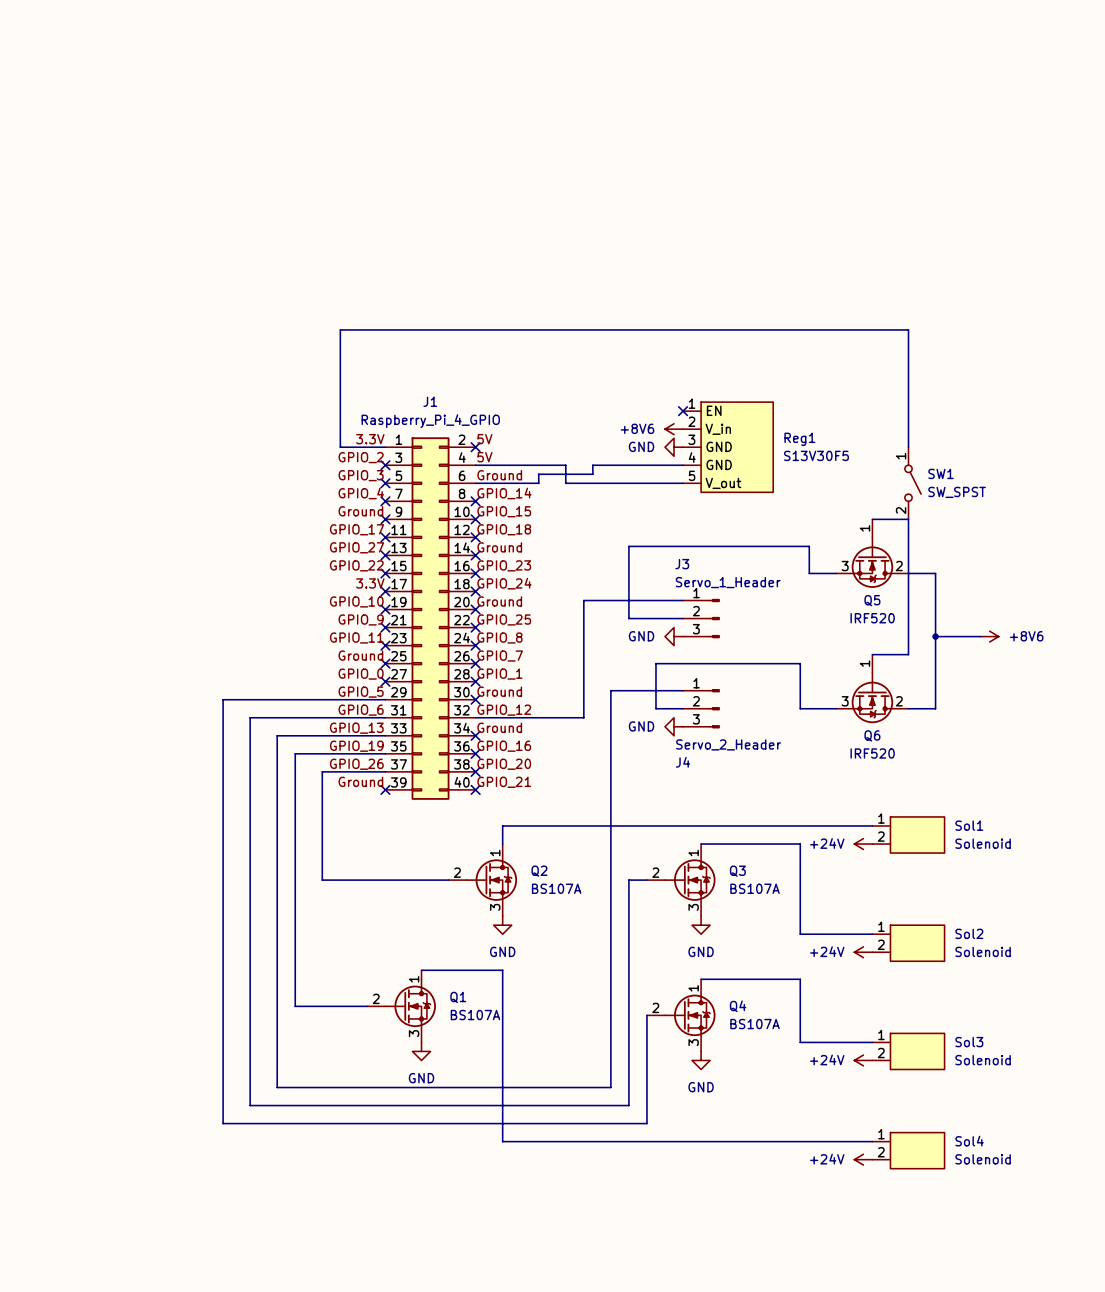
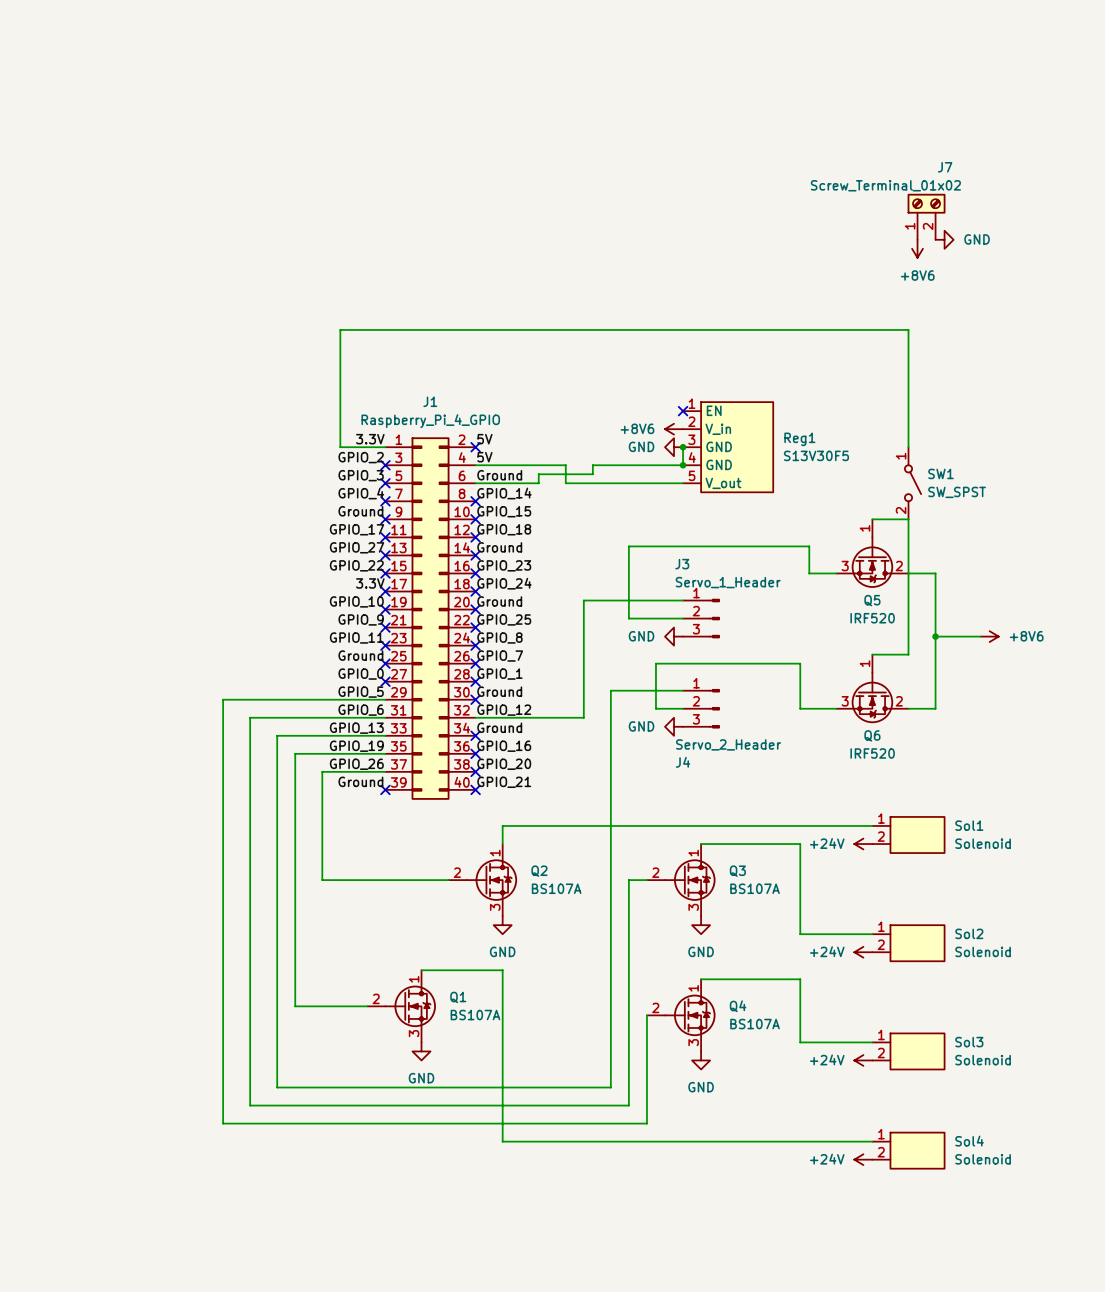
J7: none -> Screw_Terminal_01x02 (926, 216)
power symbol: none -> GND (944, 239)
power symbol: none -> +8V6 (917, 248)
wire: none -> (683, 447) (683, 465)
junction: none -> (683, 447)
junction: none -> (683, 465)

